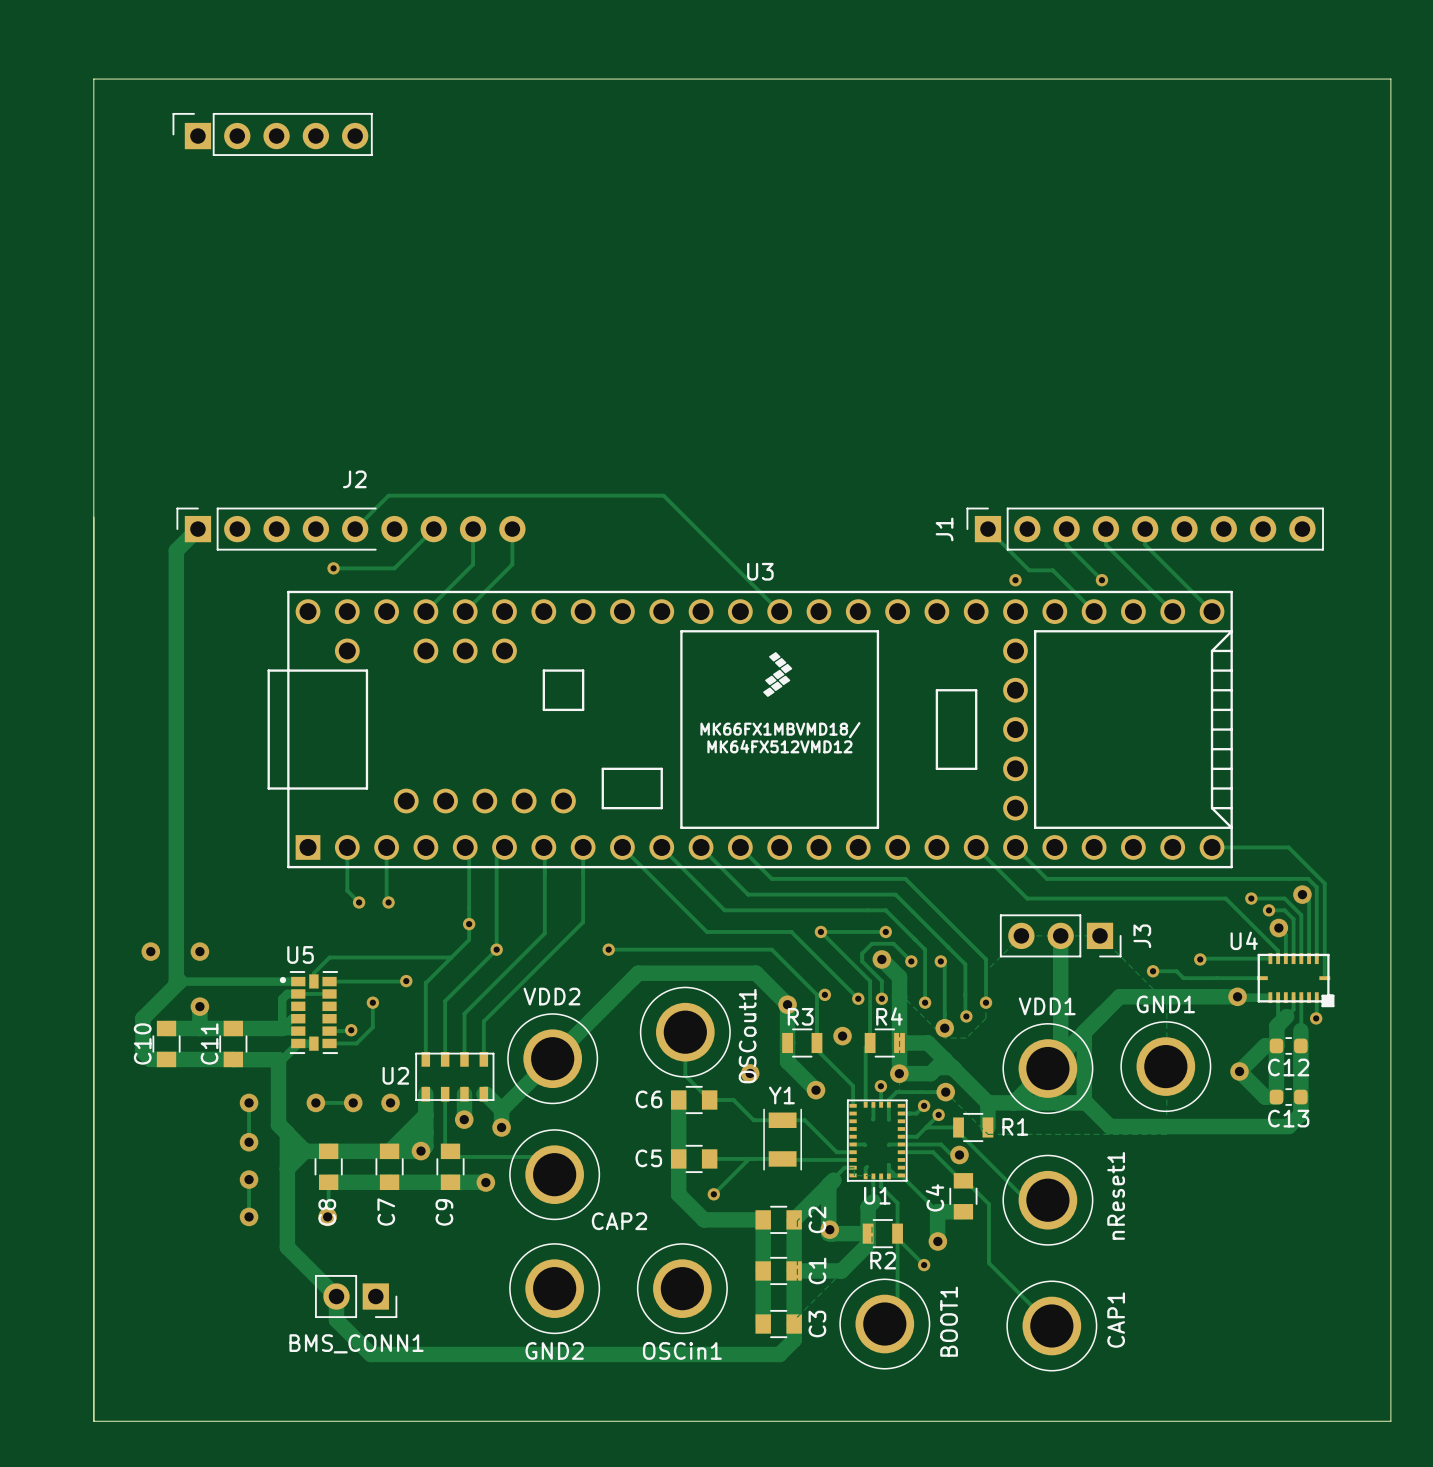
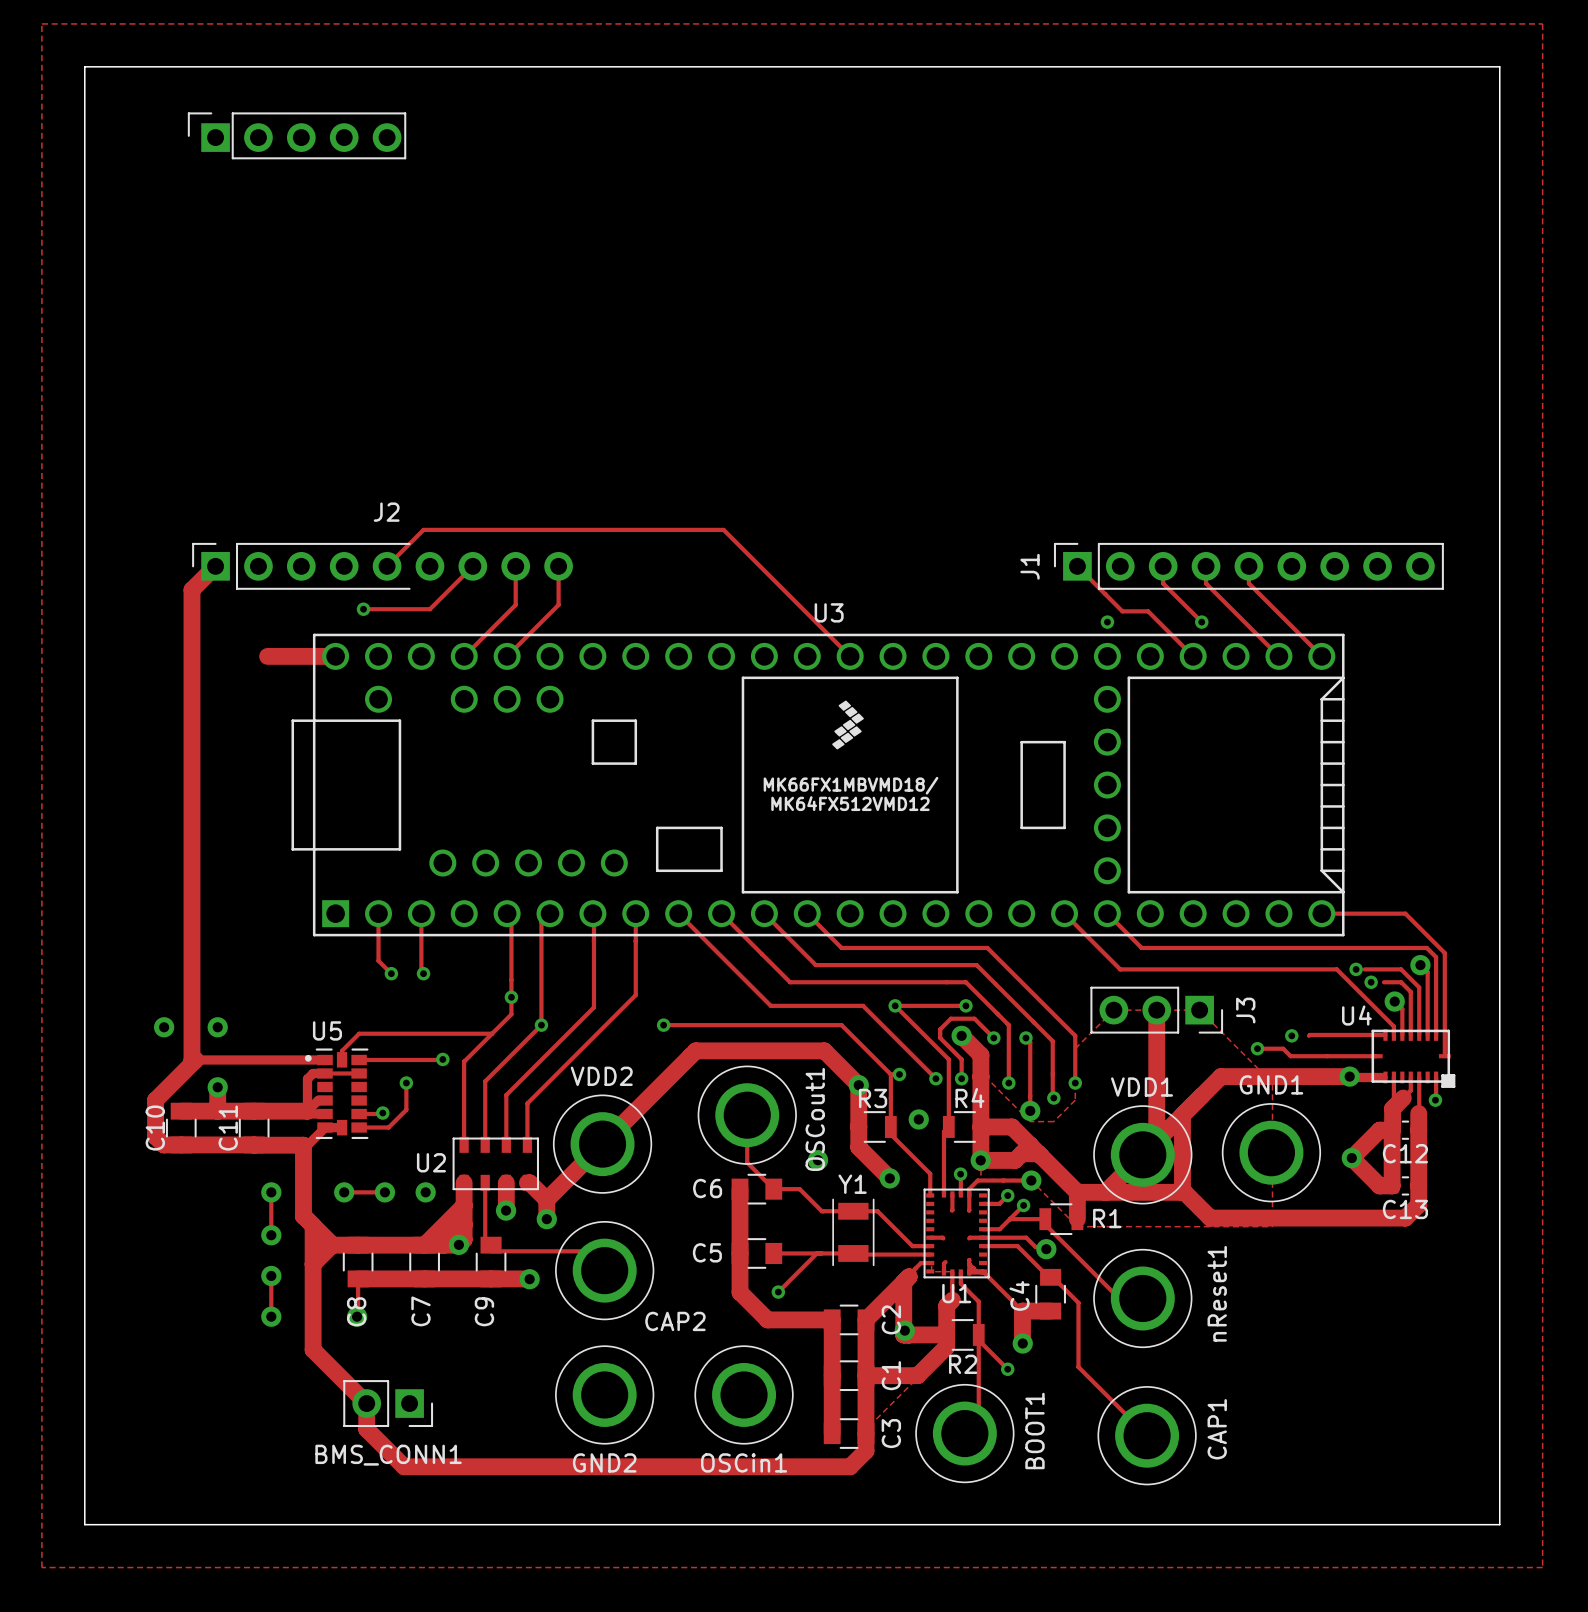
zone outline: none -> (41, 23) (1542, 23) (1542, 1567) (41, 1567) (41, 23)
board edge: (93, 79) (1390, 79) (1390, 1421) (93, 1421) (93, 79) -> (84, 66) (84, 1524) (1499, 1524) (1499, 66) (84, 66)
track: none -> (267, 656) (335, 656)
via: none -> (1356, 969)
via: (1251, 898) -> none
via: none -> (1371, 982)
via: (1269, 910) -> none
via position: (1200, 959) -> (1291, 1035)

